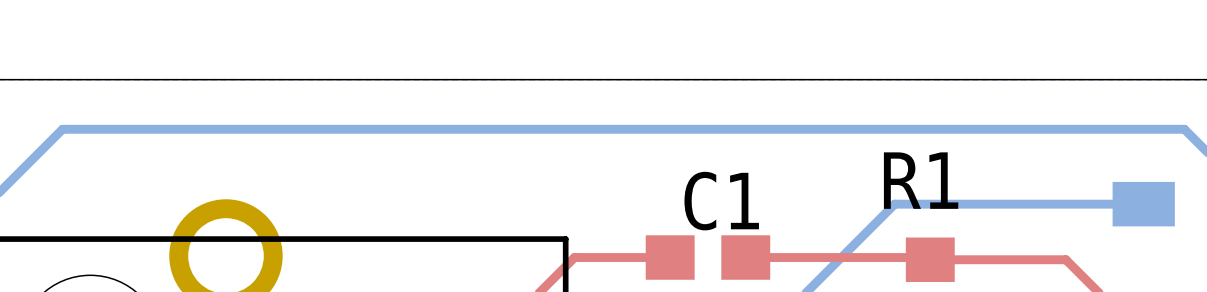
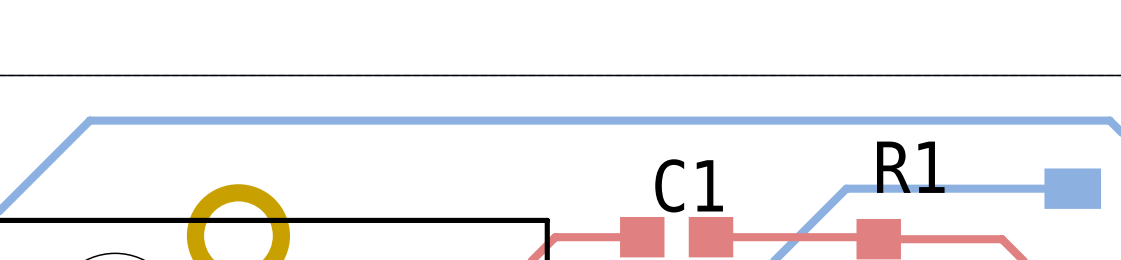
R1 name position: R1 (921, 180) -> R1 (910, 167)

